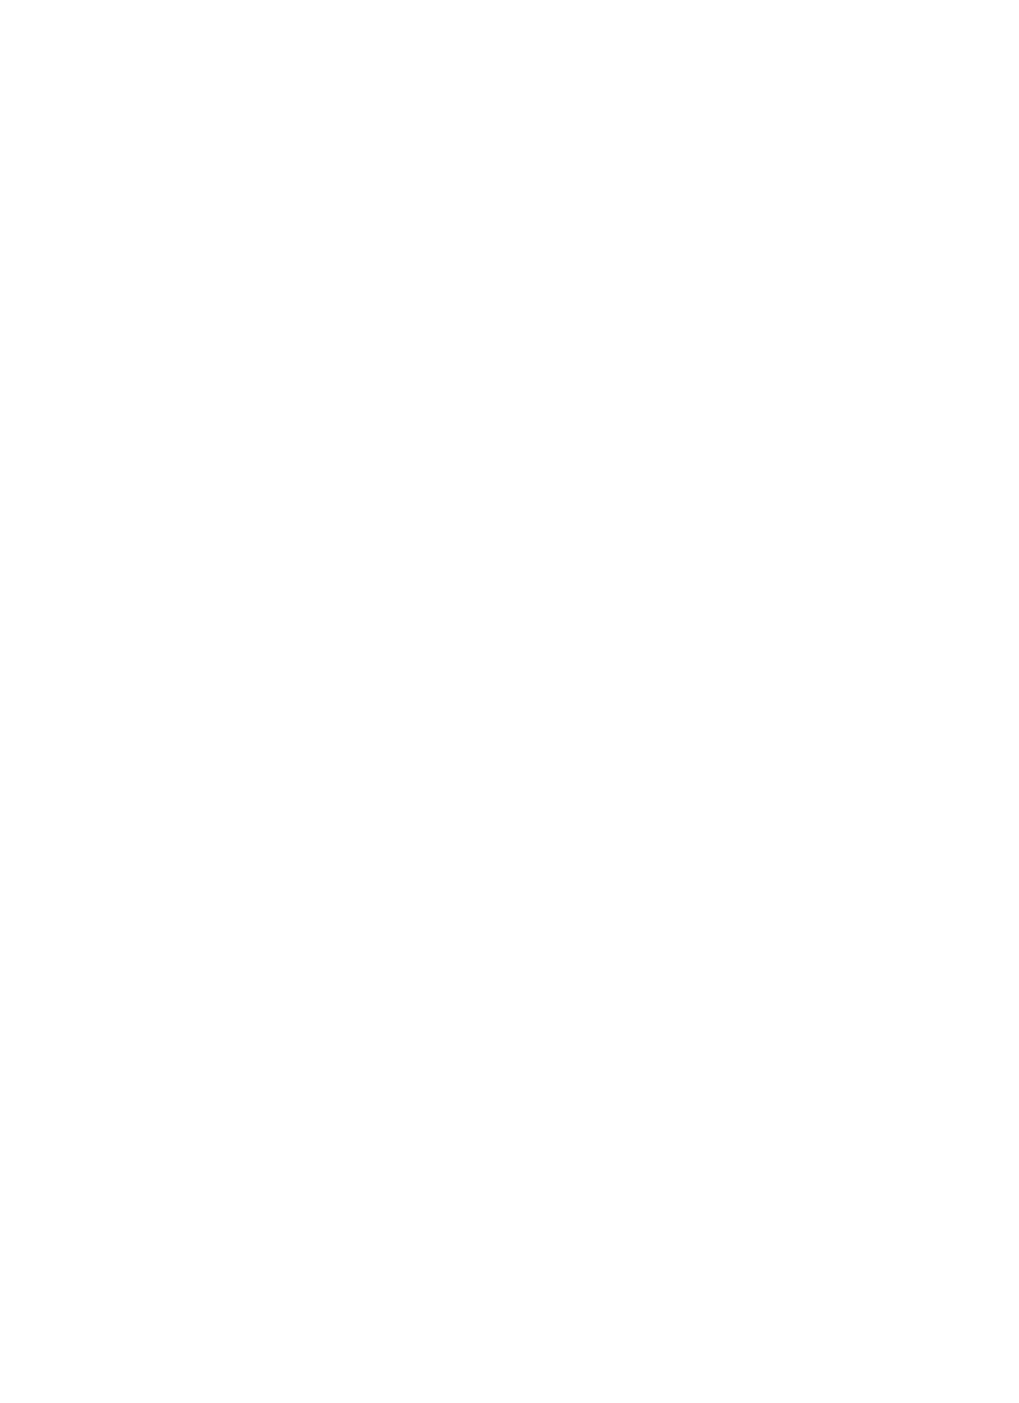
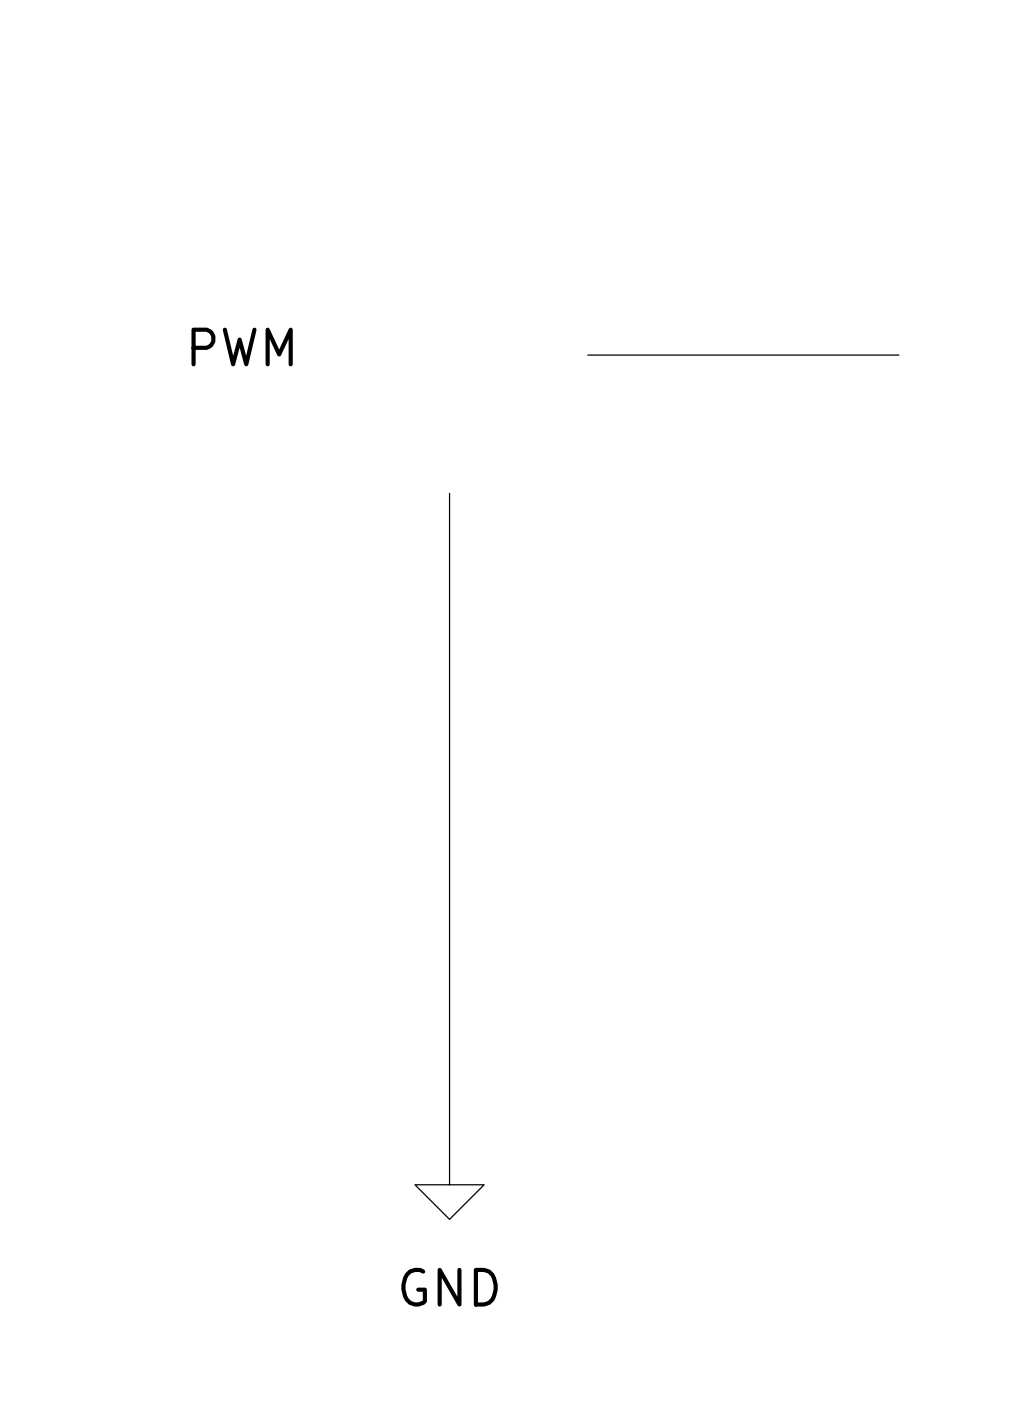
text: none -> PWM (242, 346)
wire: none -> (587, 355) (898, 355)
wire: none -> (449, 493) (449, 1150)
power symbol: none -> GND (449, 1184)

